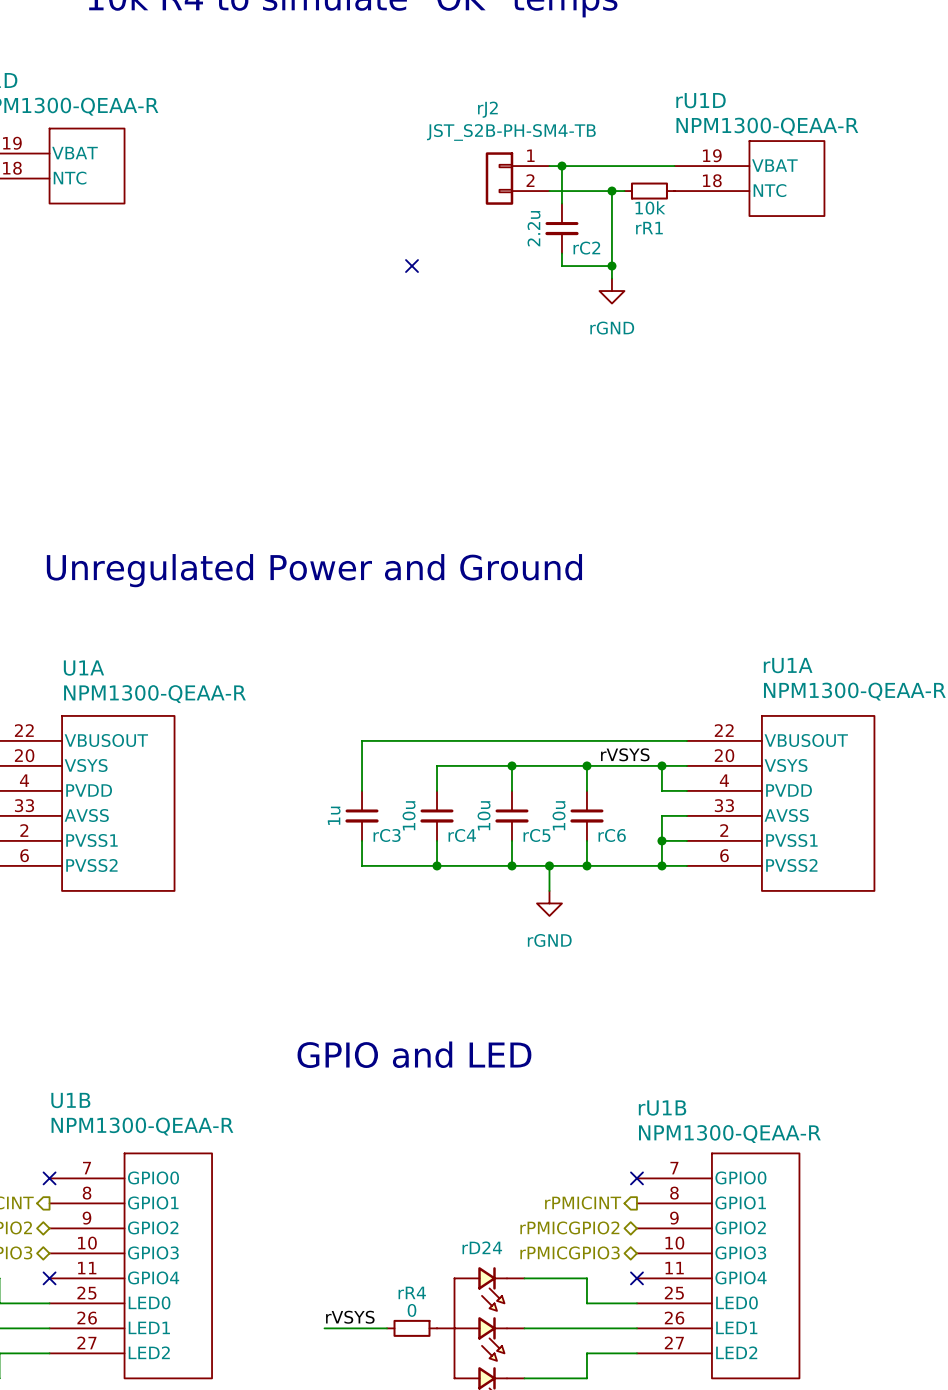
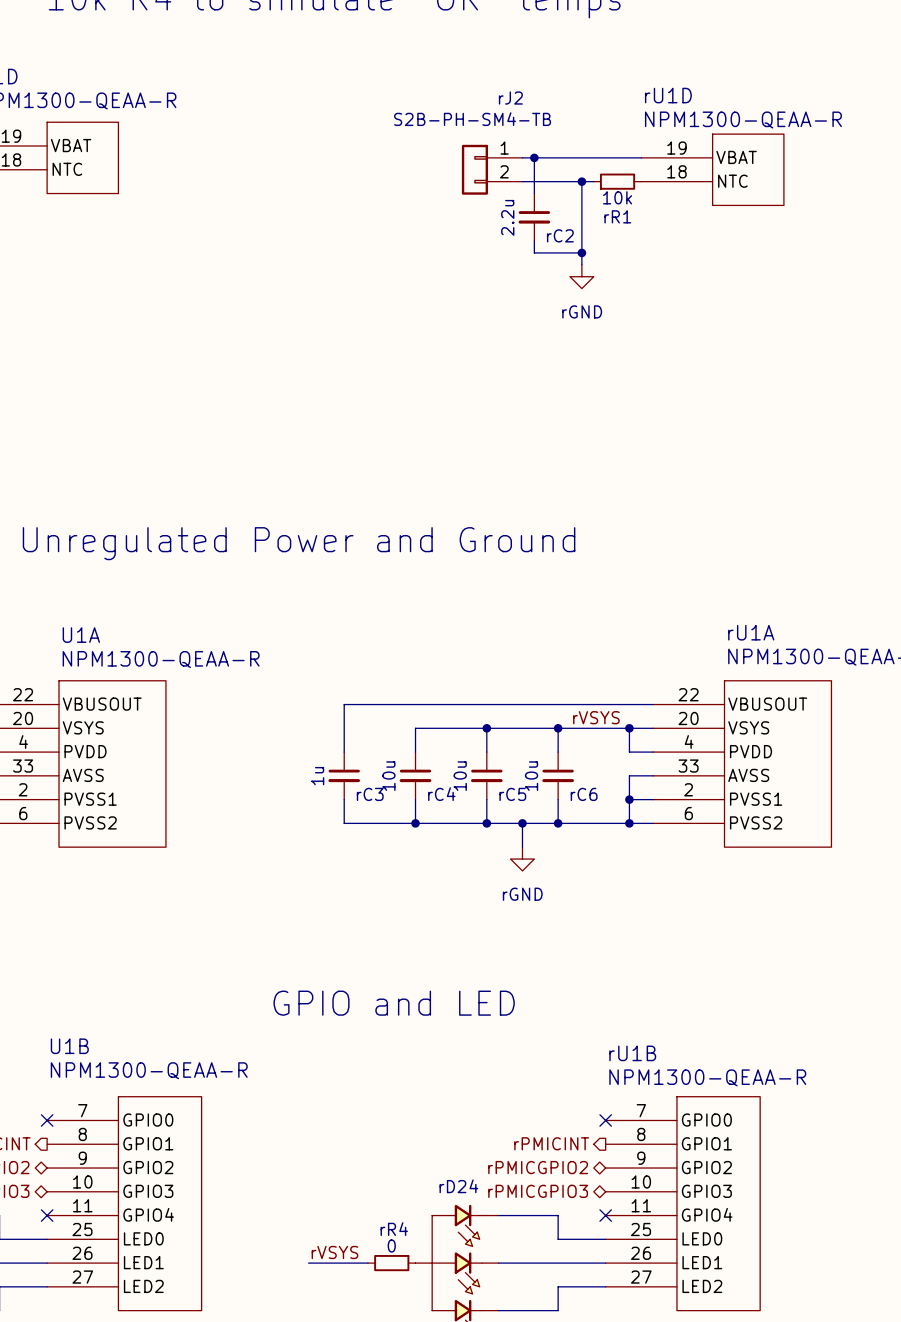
rJ2 name position: rJ2 (487, 109) -> rJ2 (510, 98)
rJ2 value: JST_S2B-PH-SM4-TB (511, 132) -> S2B-PH-SM4-TB (472, 119)
no-connect mark: (412, 266) -> none

